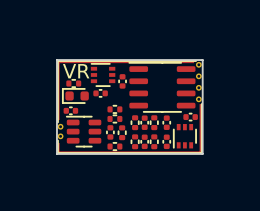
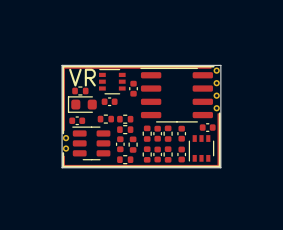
part: none -> (105, 119)

